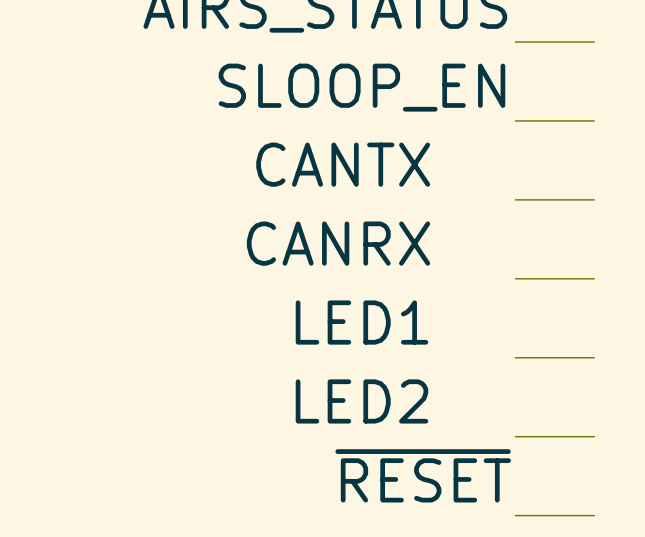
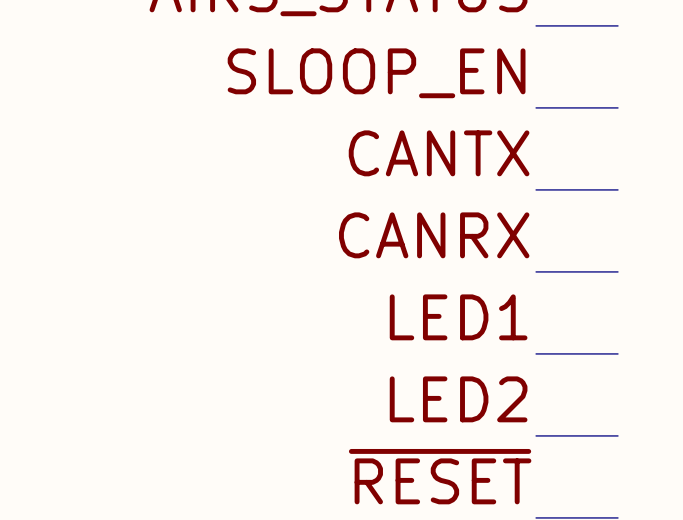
label position: CANTX (343, 164) -> CANTX (439, 153)
label position: CANRX (338, 243) -> CANRX (434, 235)
label position: LED1 (361, 322) -> LED1 (458, 317)
label position: LED2 (361, 401) -> LED2 (458, 399)

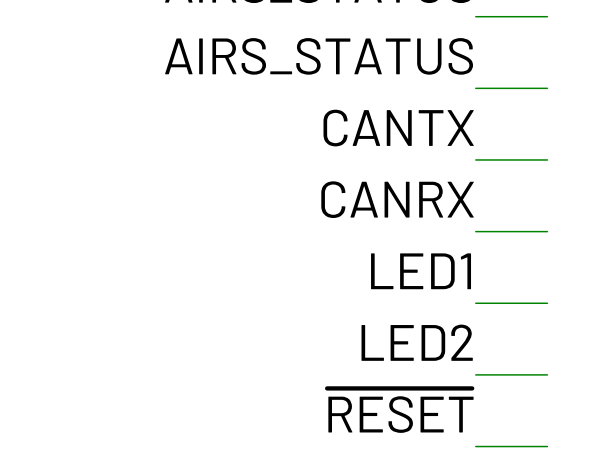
label: SLOOP_EN (376, 73) -> AIRS_STATUS (318, 56)

